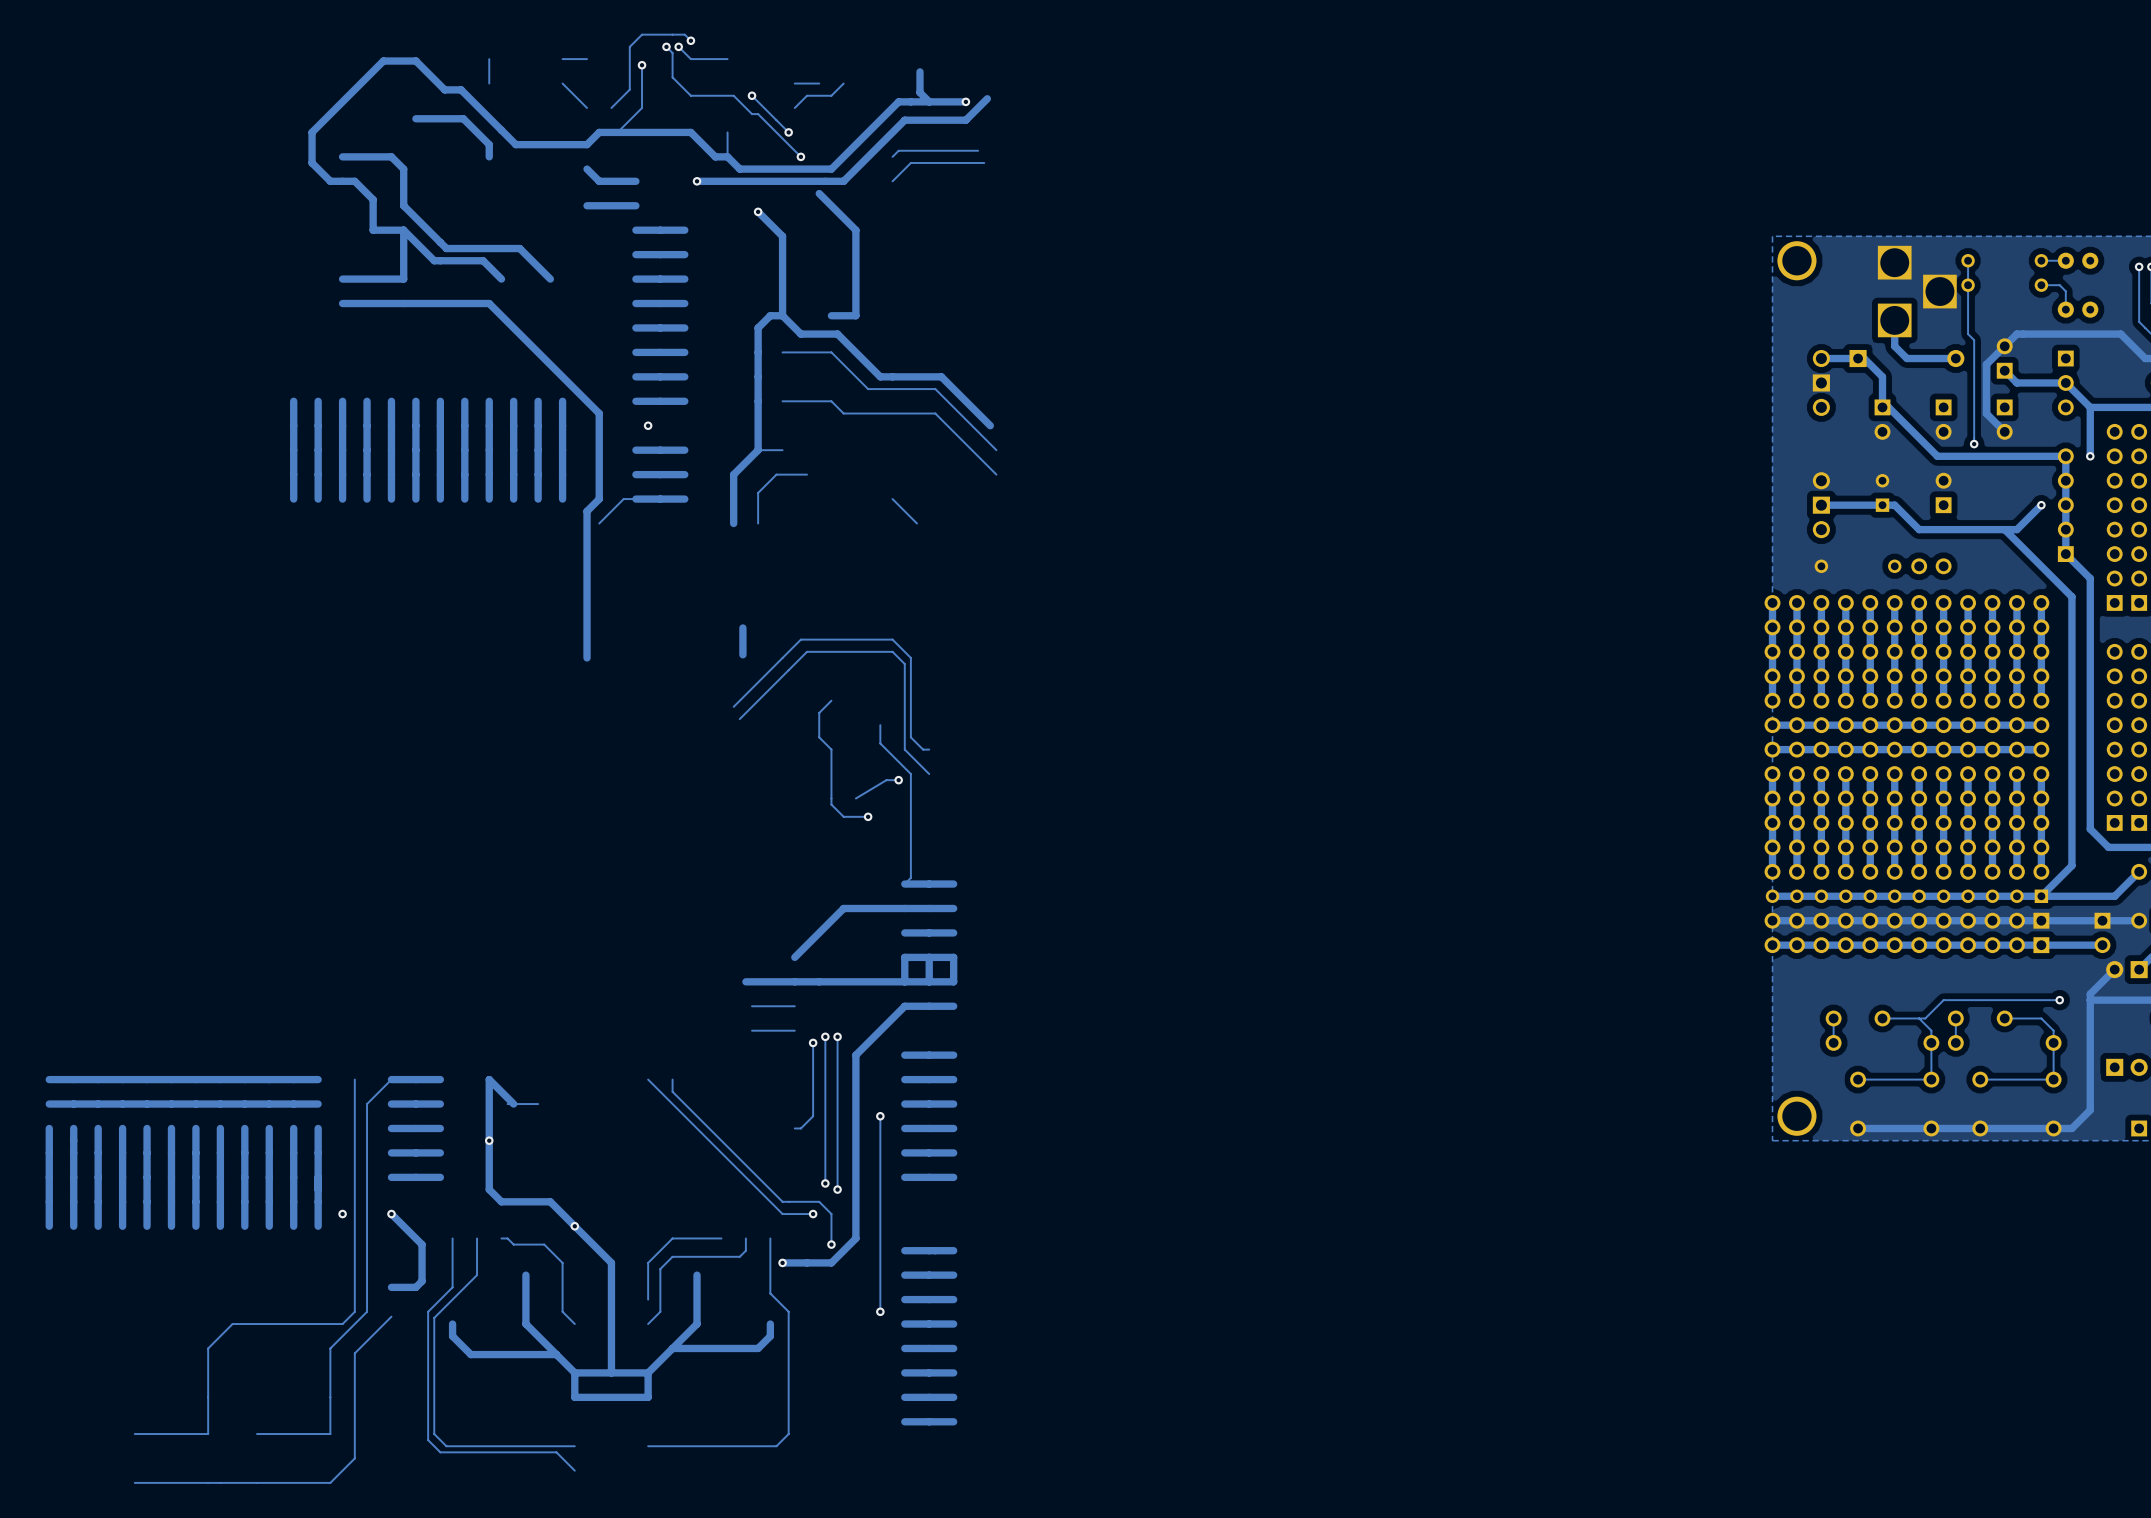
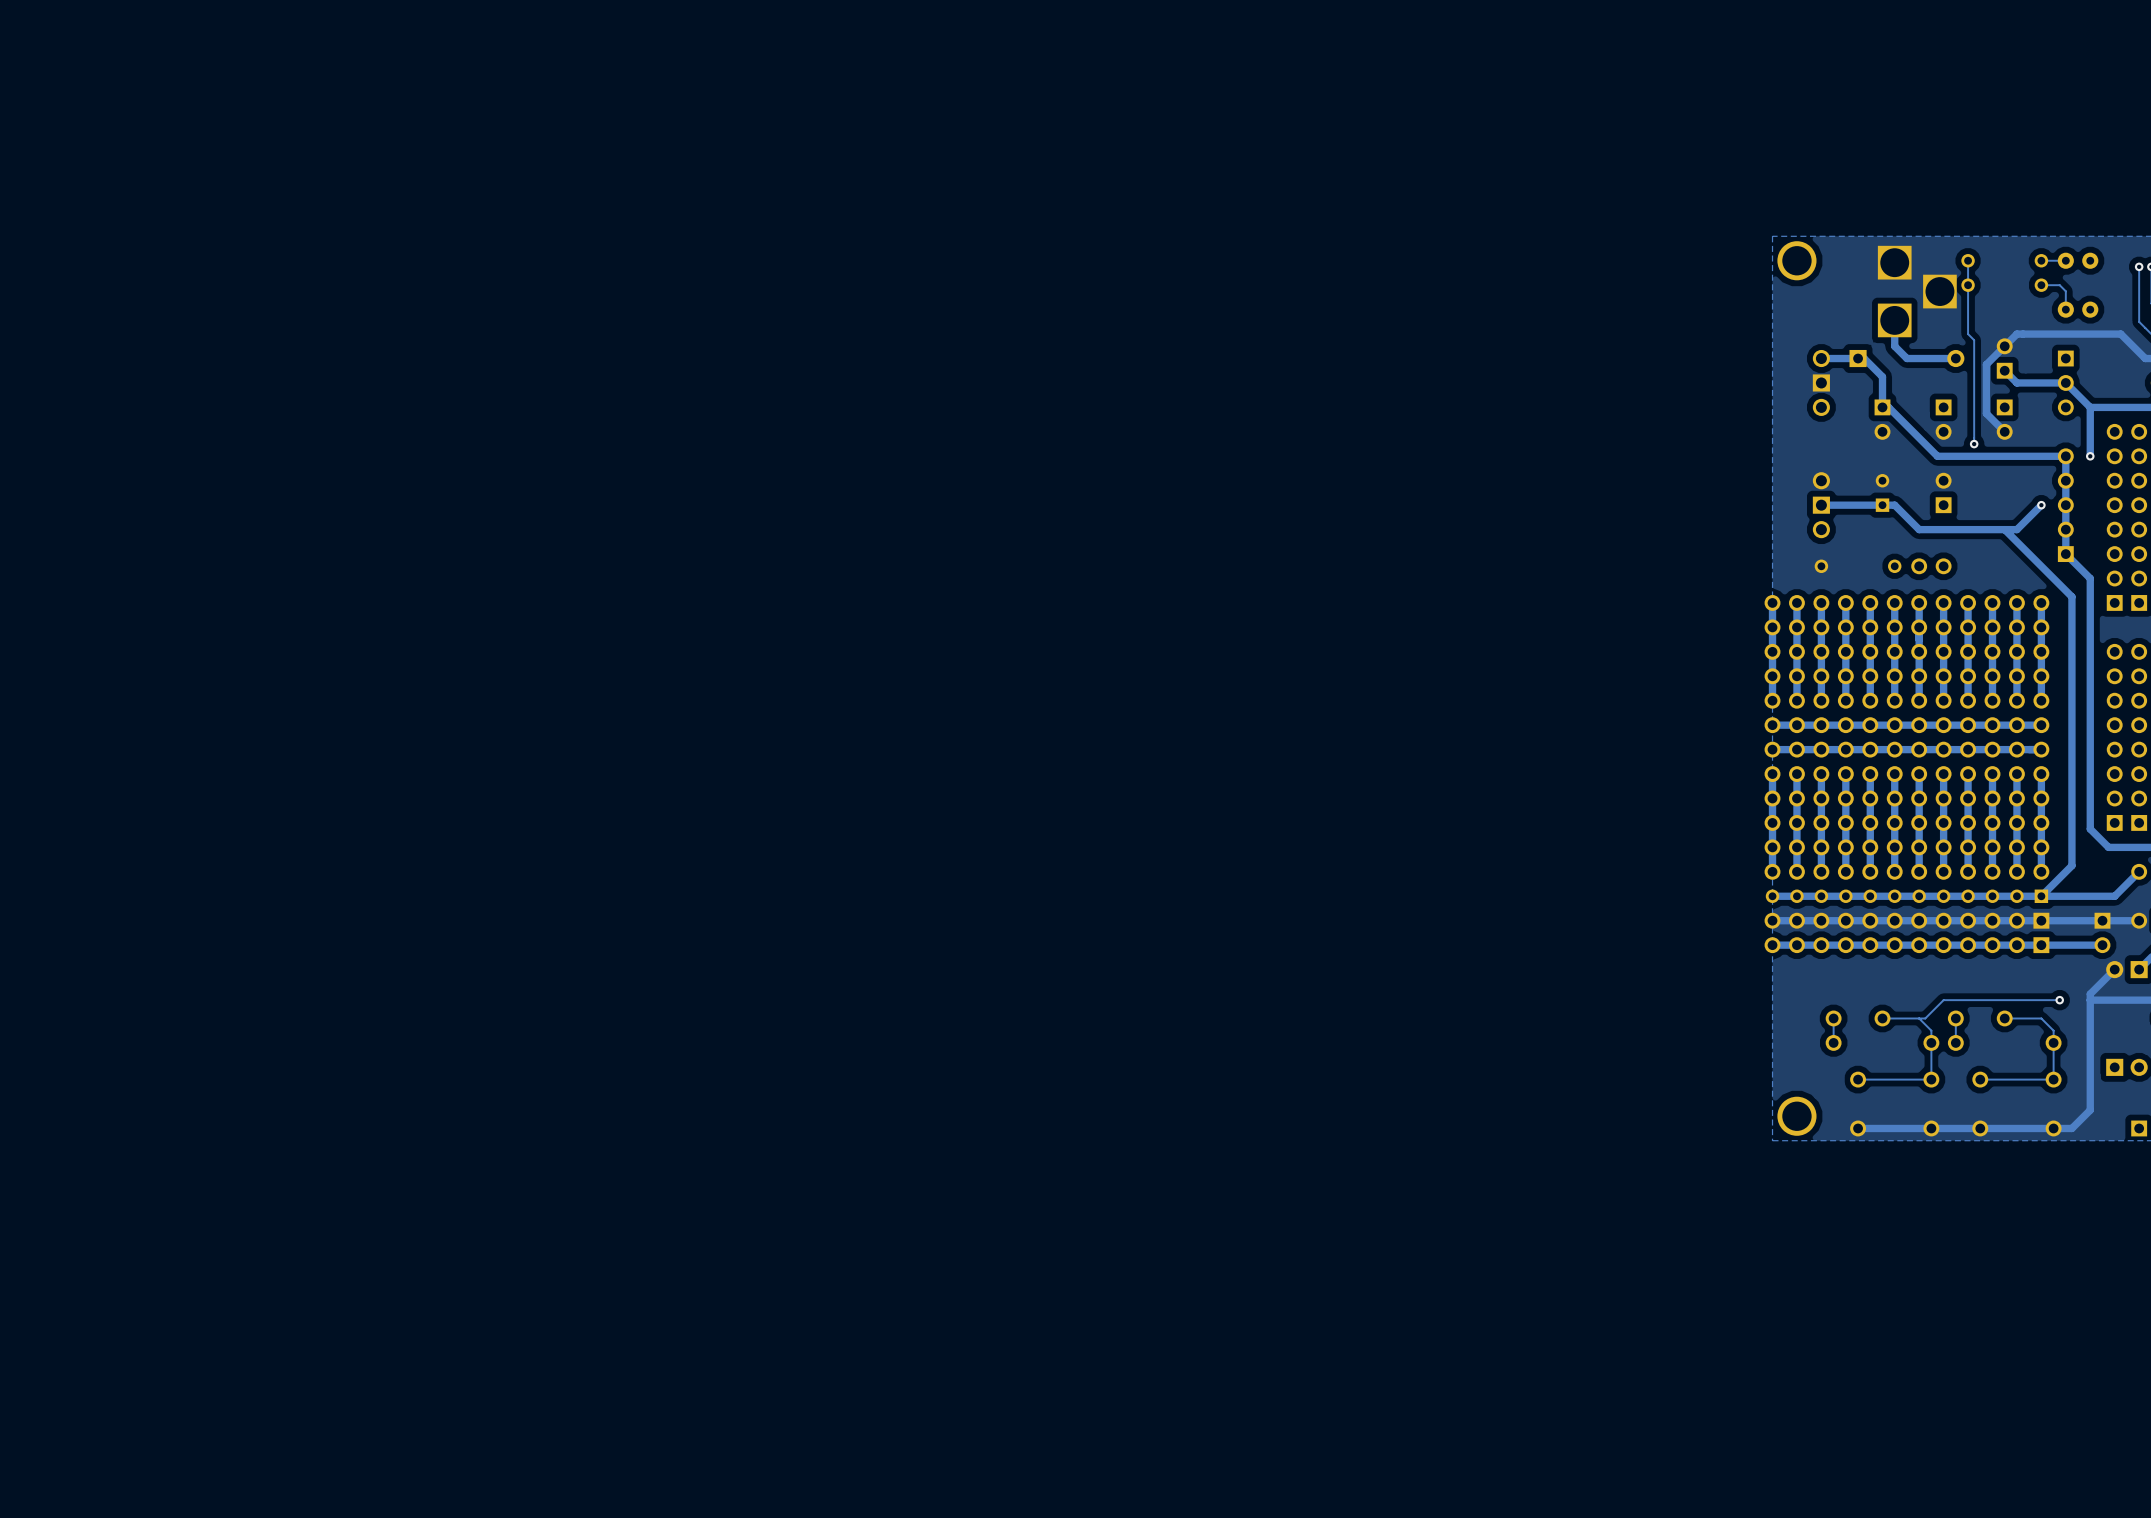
track: (690, 40) (684, 34) (642, 34) (629, 46) (629, 89) (611, 107) -> none
via: (690, 40) -> none
track: (666, 46) (672, 52) (672, 77) (690, 95) (733, 95) (752, 114) (758, 114) (800, 156) -> none
via: (666, 46) -> none
track: (678, 46) (690, 59) (727, 59) -> none
via: (678, 46) -> none
track: (489, 59) (489, 83) -> none
track: (587, 59) (562, 59) -> none
track: (642, 65) (642, 107) (617, 132) (599, 132) -> none
via: (642, 65) -> none
track: (919, 71) (919, 92) (929, 101) -> none
track: (562, 83) (587, 107) -> none
track: (819, 83) (794, 83) -> none
track: (843, 83) (831, 95) (807, 95) (794, 107) -> none
track: (752, 95) (788, 132) -> none
via: (752, 95) -> none
track: (987, 98) (965, 120) (904, 120) (843, 181) (697, 181) -> none
track: (965, 101) (898, 101) (831, 169) (739, 169) (727, 156) -> none
via: (965, 101) -> none
track: (415, 118) (463, 118) (489, 144) (489, 156) -> none
track: (599, 132) (690, 132) (715, 156) (727, 156) -> none
track: (599, 132) (587, 144) (515, 144) (461, 89) (444, 89) (415, 61) (383, 61) (312, 132) (312, 162) (330, 181) (354, 181) (373, 199) (373, 230) (403, 230) -> none
track: (727, 132) (727, 156) -> none
via: (788, 132) -> none
track: (978, 150) (898, 150) (892, 156) -> none
track: (342, 156) (391, 156) (403, 169) (403, 205) (446, 248) (519, 248) (550, 279) -> none
via: (800, 156) -> none
track: (984, 162) (910, 162) (892, 181) -> none
track: (587, 169) (599, 181) (635, 181) -> none
via: (697, 181) -> none
track: (819, 193) (855, 230) (855, 315) (831, 315) -> none
track: (635, 205) (587, 205) -> none
track: (758, 211) (782, 236) (782, 315) -> none
via: (758, 211) -> none
track: (403, 230) (403, 279) (342, 279) -> none
track: (403, 230) (434, 260) (483, 260) (501, 279) -> none
track: (684, 230) (635, 230) -> none
track: (684, 254) (635, 254) -> none
track: (684, 279) (635, 279) -> none
track: (342, 303) (489, 303) (599, 413) (599, 499) (587, 511) (587, 657) -> none
track: (684, 303) (635, 303) (660, 303) -> none
track: (782, 315) (800, 334) (837, 334) (880, 376) (941, 376) (990, 425) -> none
track: (782, 315) (770, 315) (758, 327) (758, 450) -> none
track: (684, 327) (635, 327) -> none
track: (684, 352) (635, 352) (660, 352) -> none
track: (782, 352) (831, 352) (868, 389) (935, 389) (996, 450) -> none
track: (660, 376) (684, 376) (635, 376) -> none
track: (293, 401) (293, 499) -> none
track: (318, 401) (318, 499) -> none
track: (342, 401) (342, 499) -> none
track: (367, 401) (367, 499) -> none
track: (391, 401) (391, 499) -> none
track: (415, 401) (415, 499) -> none
track: (440, 401) (440, 499) -> none
track: (464, 401) (464, 499) -> none
track: (489, 401) (489, 499) -> none
track: (513, 401) (513, 499) -> none
track: (538, 401) (538, 499) -> none
track: (562, 401) (562, 499) -> none
track: (684, 401) (635, 401) -> none
track: (782, 401) (831, 401) (843, 413) (935, 413) (996, 474) -> none
via: (648, 425) -> none
track: (684, 450) (635, 450) -> none
track: (758, 450) (733, 474) (733, 523) -> none
track: (782, 450) (758, 450) -> none
track: (684, 474) (635, 474) -> none
track: (807, 474) (776, 474) (758, 492) (758, 523) -> none
track: (684, 499) (623, 499) (599, 523) -> none
track: (892, 499) (917, 523) -> none
track: (742, 627) (742, 654) -> none
track: (831, 700) (819, 712) (819, 737) (831, 749) (831, 804) (843, 816) (868, 816) -> none
track: (733, 706) (800, 639) (892, 639) (910, 657) (910, 737) (923, 749) (929, 749) -> none
track: (739, 719) (807, 651) (892, 651) (904, 664) (904, 749) (929, 774) -> none
track: (880, 725) (880, 743) (910, 774) (910, 877) (904, 884) (953, 884) -> none
track: (898, 780) (886, 780) (855, 798) -> none
via: (898, 780) -> none
via: (868, 816) -> none
track: (953, 908) (843, 908) (794, 957) -> none
track: (953, 932) (904, 932) -> none
track: (929, 957) (929, 981) -> none
track: (819, 981) (904, 981) (904, 957) (953, 957) (953, 981) (745, 981) -> none
track: (794, 1006) (752, 1006) -> none
track: (953, 1006) (904, 1006) (855, 1055) (855, 1238) (831, 1262) (782, 1262) -> none
track: (794, 1030) (752, 1030) -> none
track: (825, 1036) (825, 1183) -> none
via: (825, 1036) -> none
track: (837, 1036) (837, 1189) -> none
via: (837, 1036) -> none
track: (813, 1042) (813, 1116) (800, 1128) (794, 1128) -> none
via: (813, 1042) -> none
track: (953, 1055) (904, 1055) -> none
track: (318, 1079) (49, 1079) -> none
track: (354, 1079) (354, 1311) (342, 1324) (232, 1324) (208, 1348) (208, 1434) (134, 1434) -> none
track: (440, 1079) (391, 1079) (367, 1104) (367, 1311) (330, 1348) (330, 1434) (257, 1434) -> none
track: (648, 1079) (782, 1214) (813, 1214) -> none
track: (672, 1079) (672, 1091) (782, 1201) (819, 1201) (831, 1214) (831, 1244) -> none
track: (953, 1079) (904, 1079) -> none
track: (318, 1104) (49, 1104) -> none
track: (440, 1104) (391, 1104) -> none
track: (513, 1104) (489, 1079) (489, 1189) (501, 1201) (550, 1201) (611, 1262) (611, 1372) -> none
track: (538, 1104) (507, 1104) -> none
track: (953, 1104) (904, 1104) -> none
track: (880, 1116) (880, 1311) -> none
via: (880, 1116) -> none
track: (49, 1128) (49, 1226) -> none
track: (73, 1128) (73, 1226) -> none
track: (98, 1128) (98, 1226) -> none
track: (122, 1128) (122, 1226) -> none
track: (147, 1128) (147, 1226) -> none
track: (171, 1128) (171, 1226) -> none
track: (195, 1128) (195, 1226) -> none
track: (220, 1128) (220, 1226) -> none
track: (244, 1128) (244, 1226) -> none
track: (269, 1128) (269, 1226) -> none
track: (293, 1128) (293, 1226) -> none
track: (318, 1128) (318, 1226) -> none
track: (440, 1128) (391, 1128) -> none
track: (953, 1128) (904, 1128) -> none
via: (489, 1140) -> none
track: (440, 1152) (391, 1152) -> none
track: (953, 1152) (904, 1152) -> none
track: (440, 1177) (391, 1177) -> none
track: (953, 1177) (904, 1177) -> none
via: (825, 1183) -> none
via: (837, 1189) -> none
via: (342, 1214) -> none
track: (391, 1214) (422, 1244) (422, 1281) (415, 1287) (391, 1287) -> none
via: (391, 1214) -> none
via: (813, 1214) -> none
via: (574, 1226) -> none
track: (452, 1238) (452, 1287) (428, 1311) (428, 1440) (440, 1452) (556, 1452) (574, 1470) -> none
track: (477, 1238) (477, 1275) (434, 1317) (434, 1434) (446, 1446) (574, 1446) -> none
track: (501, 1238) (507, 1238) (513, 1244) (544, 1244) (562, 1262) (562, 1311) (574, 1324) -> none
track: (721, 1238) (672, 1238) (648, 1262) (648, 1299) -> none
track: (745, 1238) (745, 1250) (739, 1256) (672, 1256) (660, 1269) (660, 1311) (648, 1324) -> none
track: (770, 1238) (770, 1293) (788, 1311) (788, 1434) (776, 1446) (648, 1446) -> none
via: (831, 1244) -> none
track: (953, 1250) (904, 1250) -> none
via: (782, 1262) -> none
track: (525, 1275) (525, 1324) (574, 1372) -> none
track: (697, 1275) (697, 1324) (648, 1372) -> none
track: (953, 1275) (904, 1275) -> none
track: (953, 1299) (904, 1299) -> none
via: (880, 1311) -> none
track: (391, 1316) (354, 1353) (354, 1458) (330, 1482) (134, 1482) -> none
track: (452, 1324) (452, 1336) (470, 1354) (556, 1354) -> none
track: (770, 1324) (770, 1336) (758, 1348) (672, 1348) -> none
track: (953, 1324) (904, 1324) -> none
track: (953, 1348) (904, 1348) -> none
track: (648, 1372) (574, 1372) -> none
track: (648, 1372) (648, 1397) (574, 1397) (574, 1372) -> none
track: (953, 1372) (904, 1372) -> none
track: (953, 1397) (904, 1397) -> none
track: (953, 1421) (904, 1421) -> none

